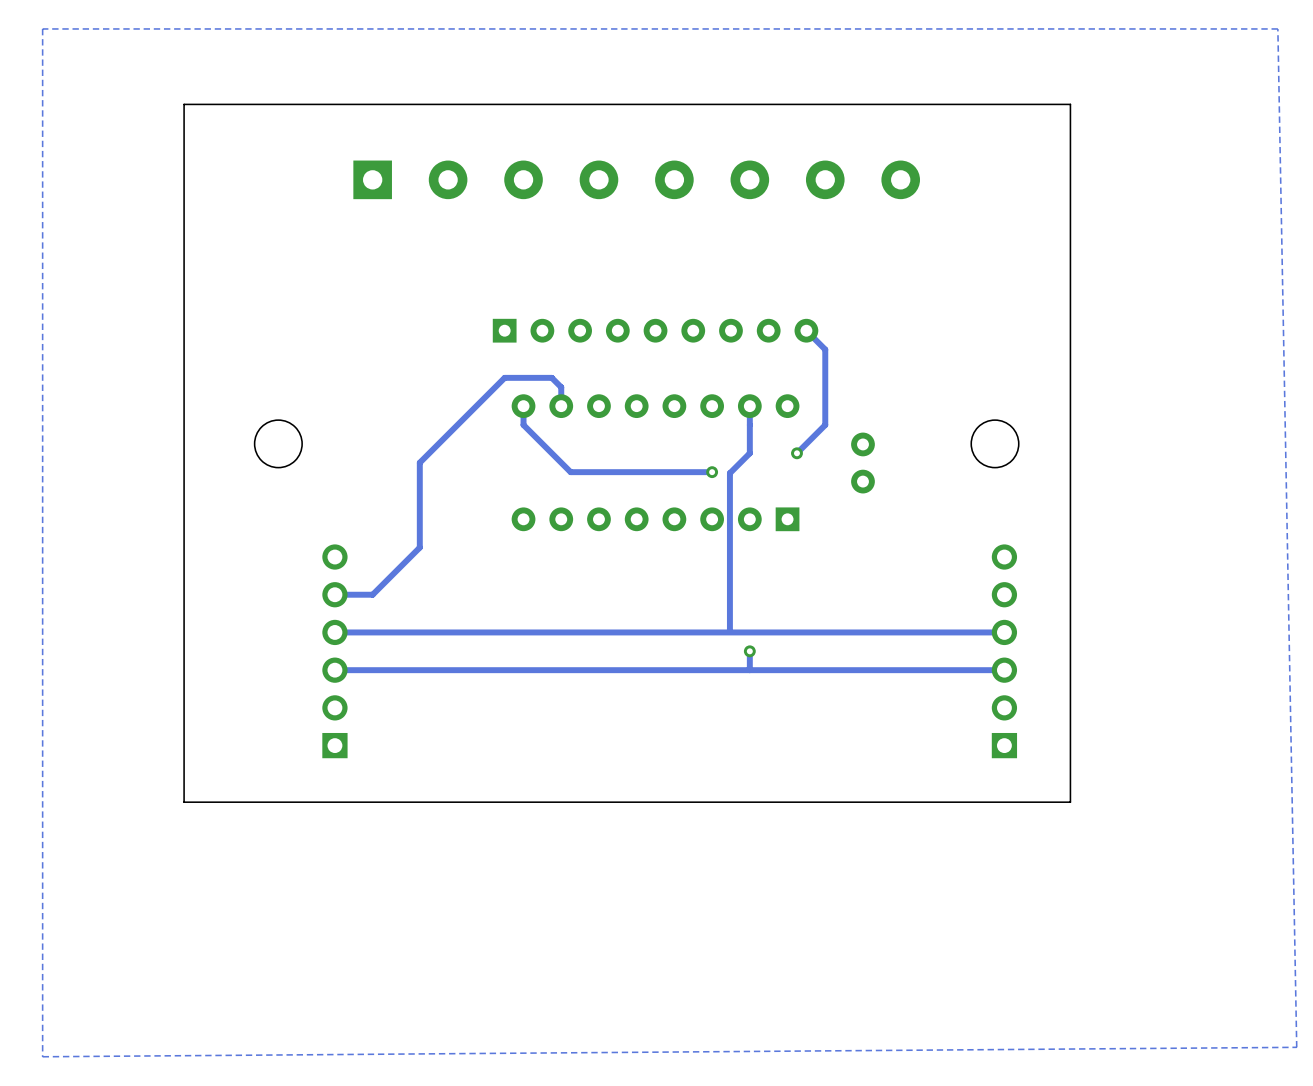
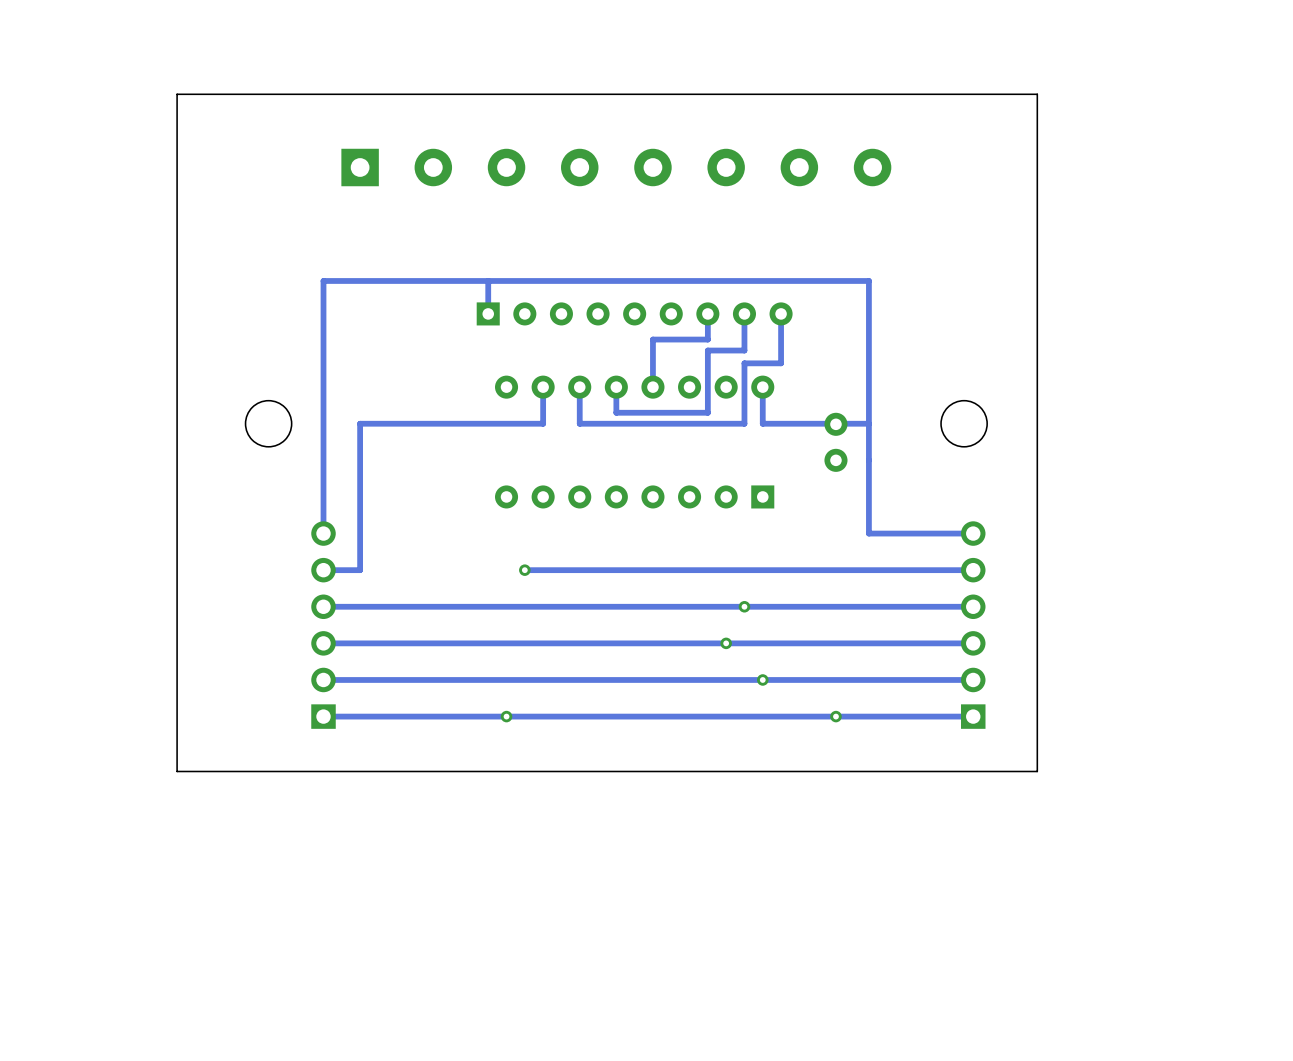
zone outline: (1277, 28) (1296, 1047) (42, 1056) (42, 28) (1277, 28) -> none
track: none -> (488, 280) (488, 313)
track: none -> (707, 313) (707, 339) (652, 339) (652, 387)
track: none -> (744, 313) (744, 350) (707, 350) (707, 412) (616, 412) (616, 387)
track: (806, 330) (825, 349) (825, 425) (796, 453) -> (781, 313) (781, 363) (744, 363) (744, 423) (579, 423) (579, 387)
track: (523, 406) (523, 425) (570, 472) (712, 472) -> none
track: (561, 406) (561, 387) (551, 377) (504, 377) (419, 462) (419, 547) (372, 594) -> (543, 387) (543, 423) (360, 423) (360, 570)
track: (749, 406) (749, 453) (729, 473) (729, 631) -> none
track: none -> (762, 387) (762, 423) (868, 423)
via: (796, 453) -> none
via: (712, 472) -> none
track: none -> (973, 533) (868, 533) (868, 280) (323, 280) (323, 533)
via: none -> (524, 570)
track: none -> (973, 570) (524, 570)
via: none -> (744, 606)
track: (749, 651) (749, 670) -> none
via: (749, 651) -> none
via: none -> (726, 643)
via: none -> (762, 679)
track: none -> (973, 679) (323, 679)
via: none -> (506, 716)
via: none -> (835, 716)
track: none -> (973, 716) (323, 716)

